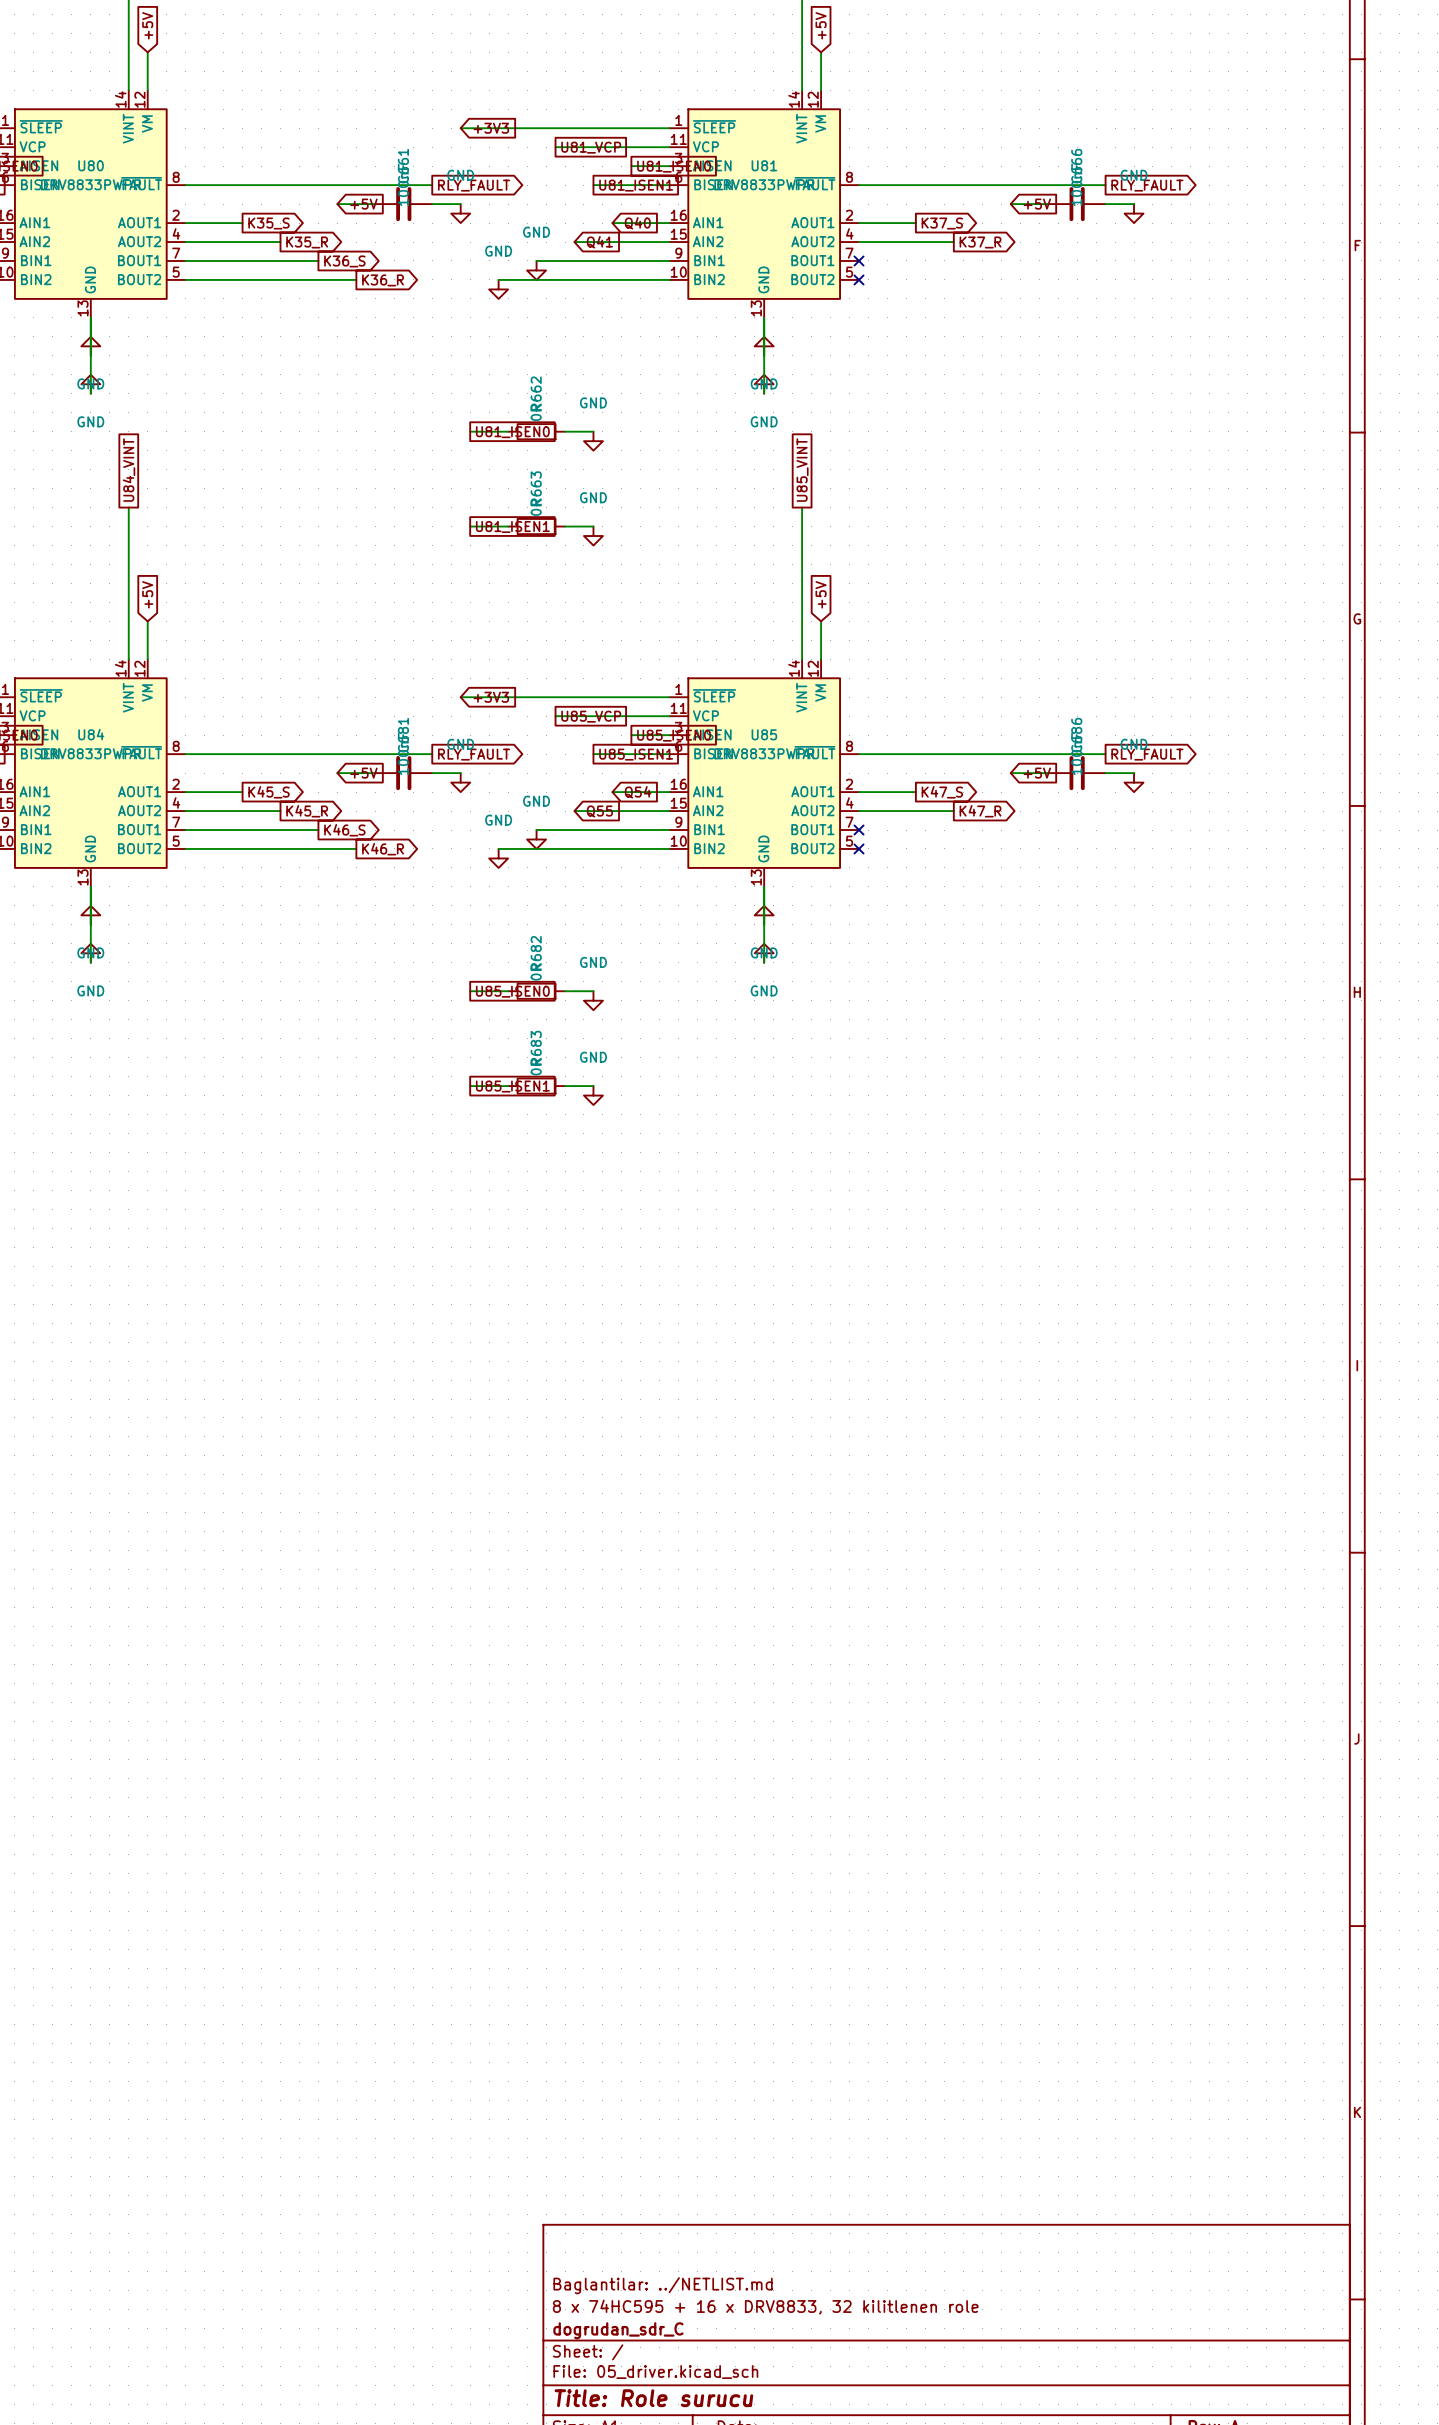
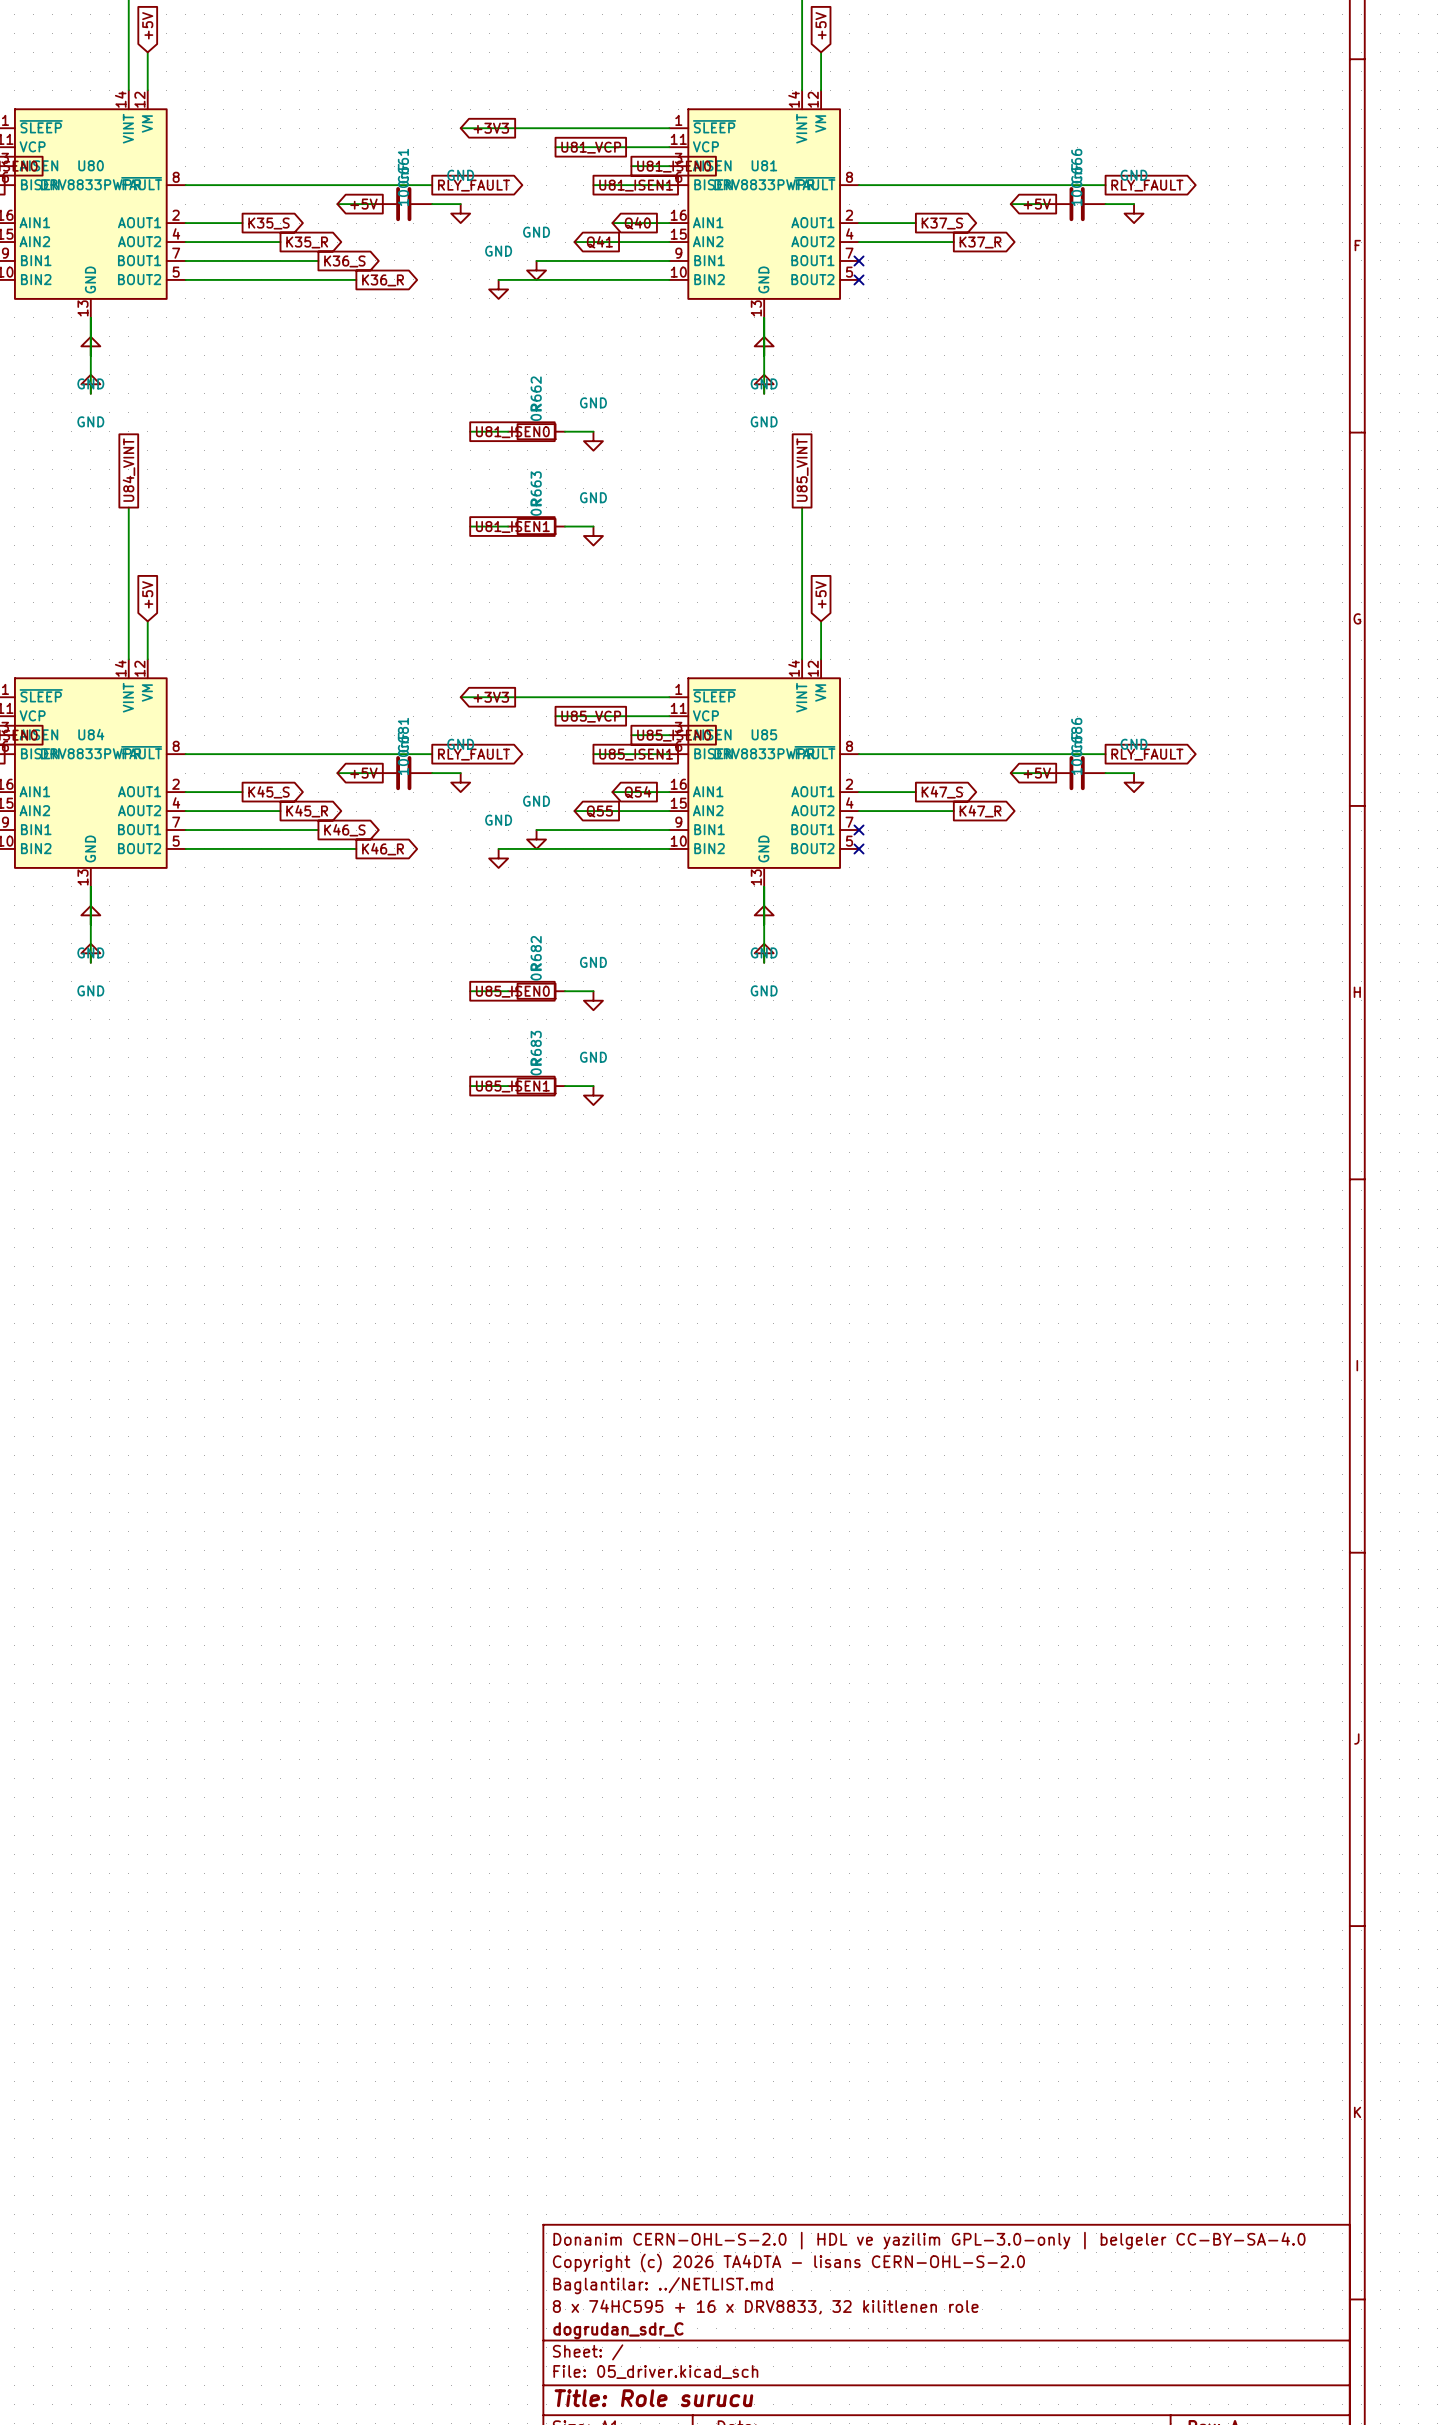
title block: none -> Donanim CERN-OHL-S-2.0 | HDL ve yazilim GPL-3.0-only | belgeler CC-BY-SA-4.0 (929, 2240)
title block: none -> Copyright (c) 2026 TA4DTA - lisans CERN-OHL-S-2.0 (788, 2263)

